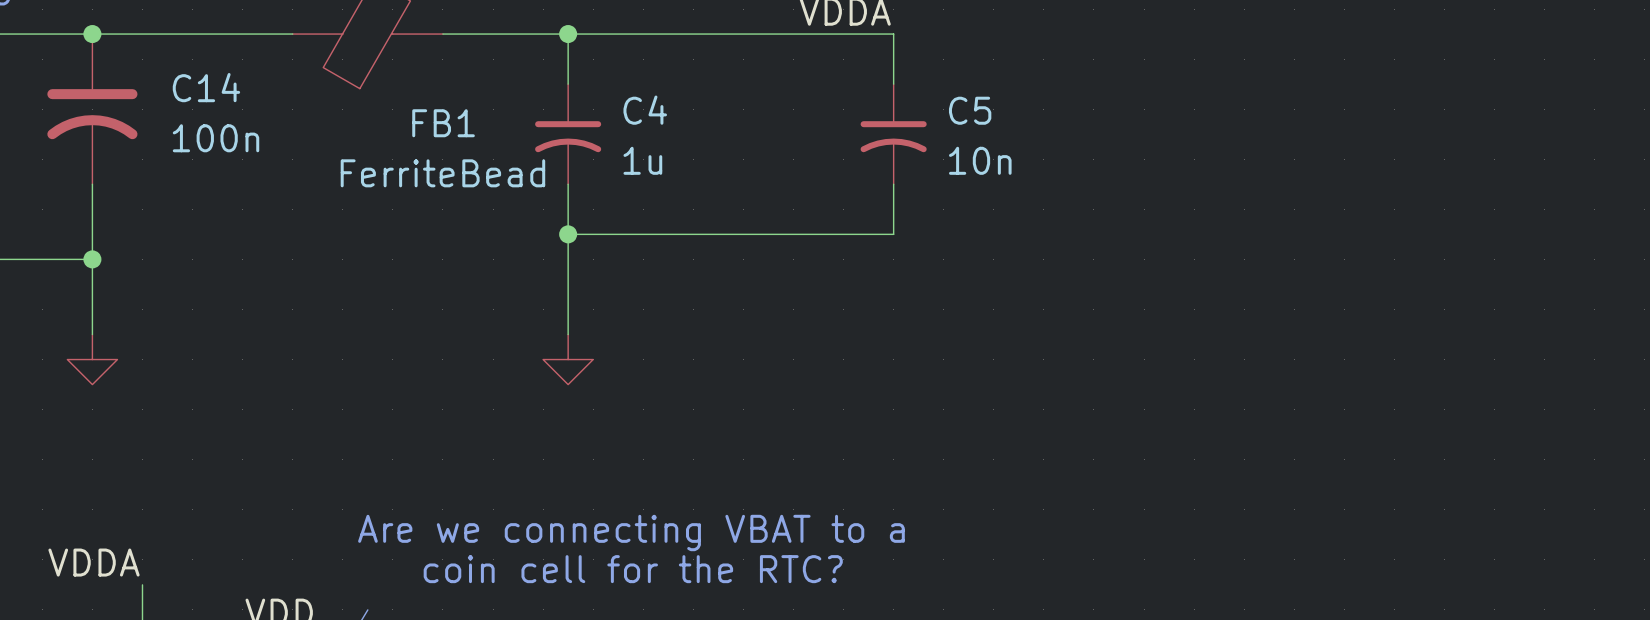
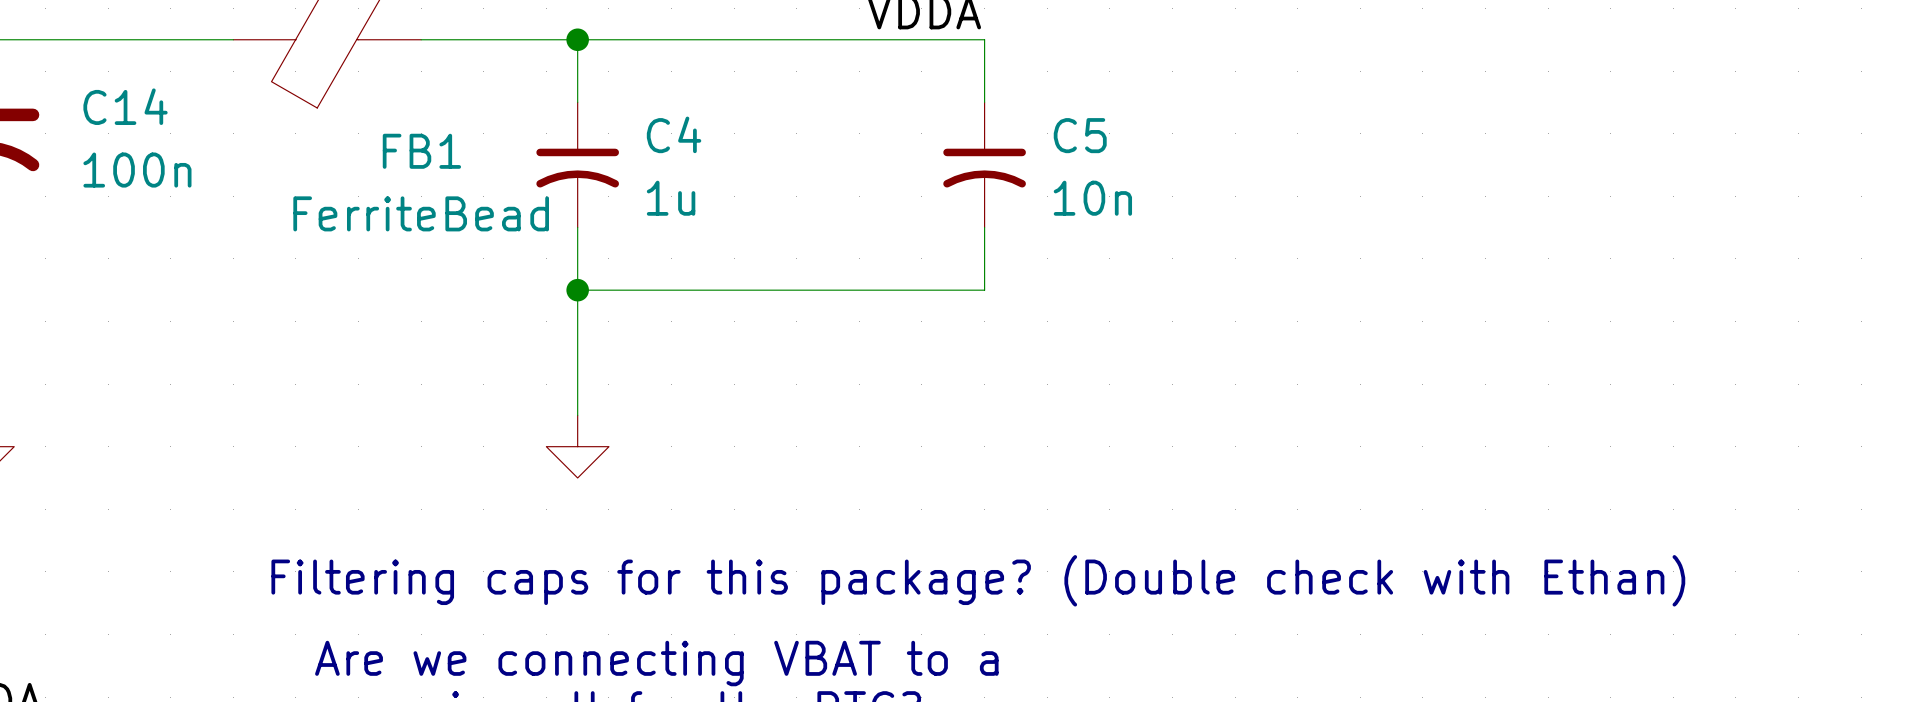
text: none -> Filtering caps for this package? (Double check with Ethan) (978, 580)

